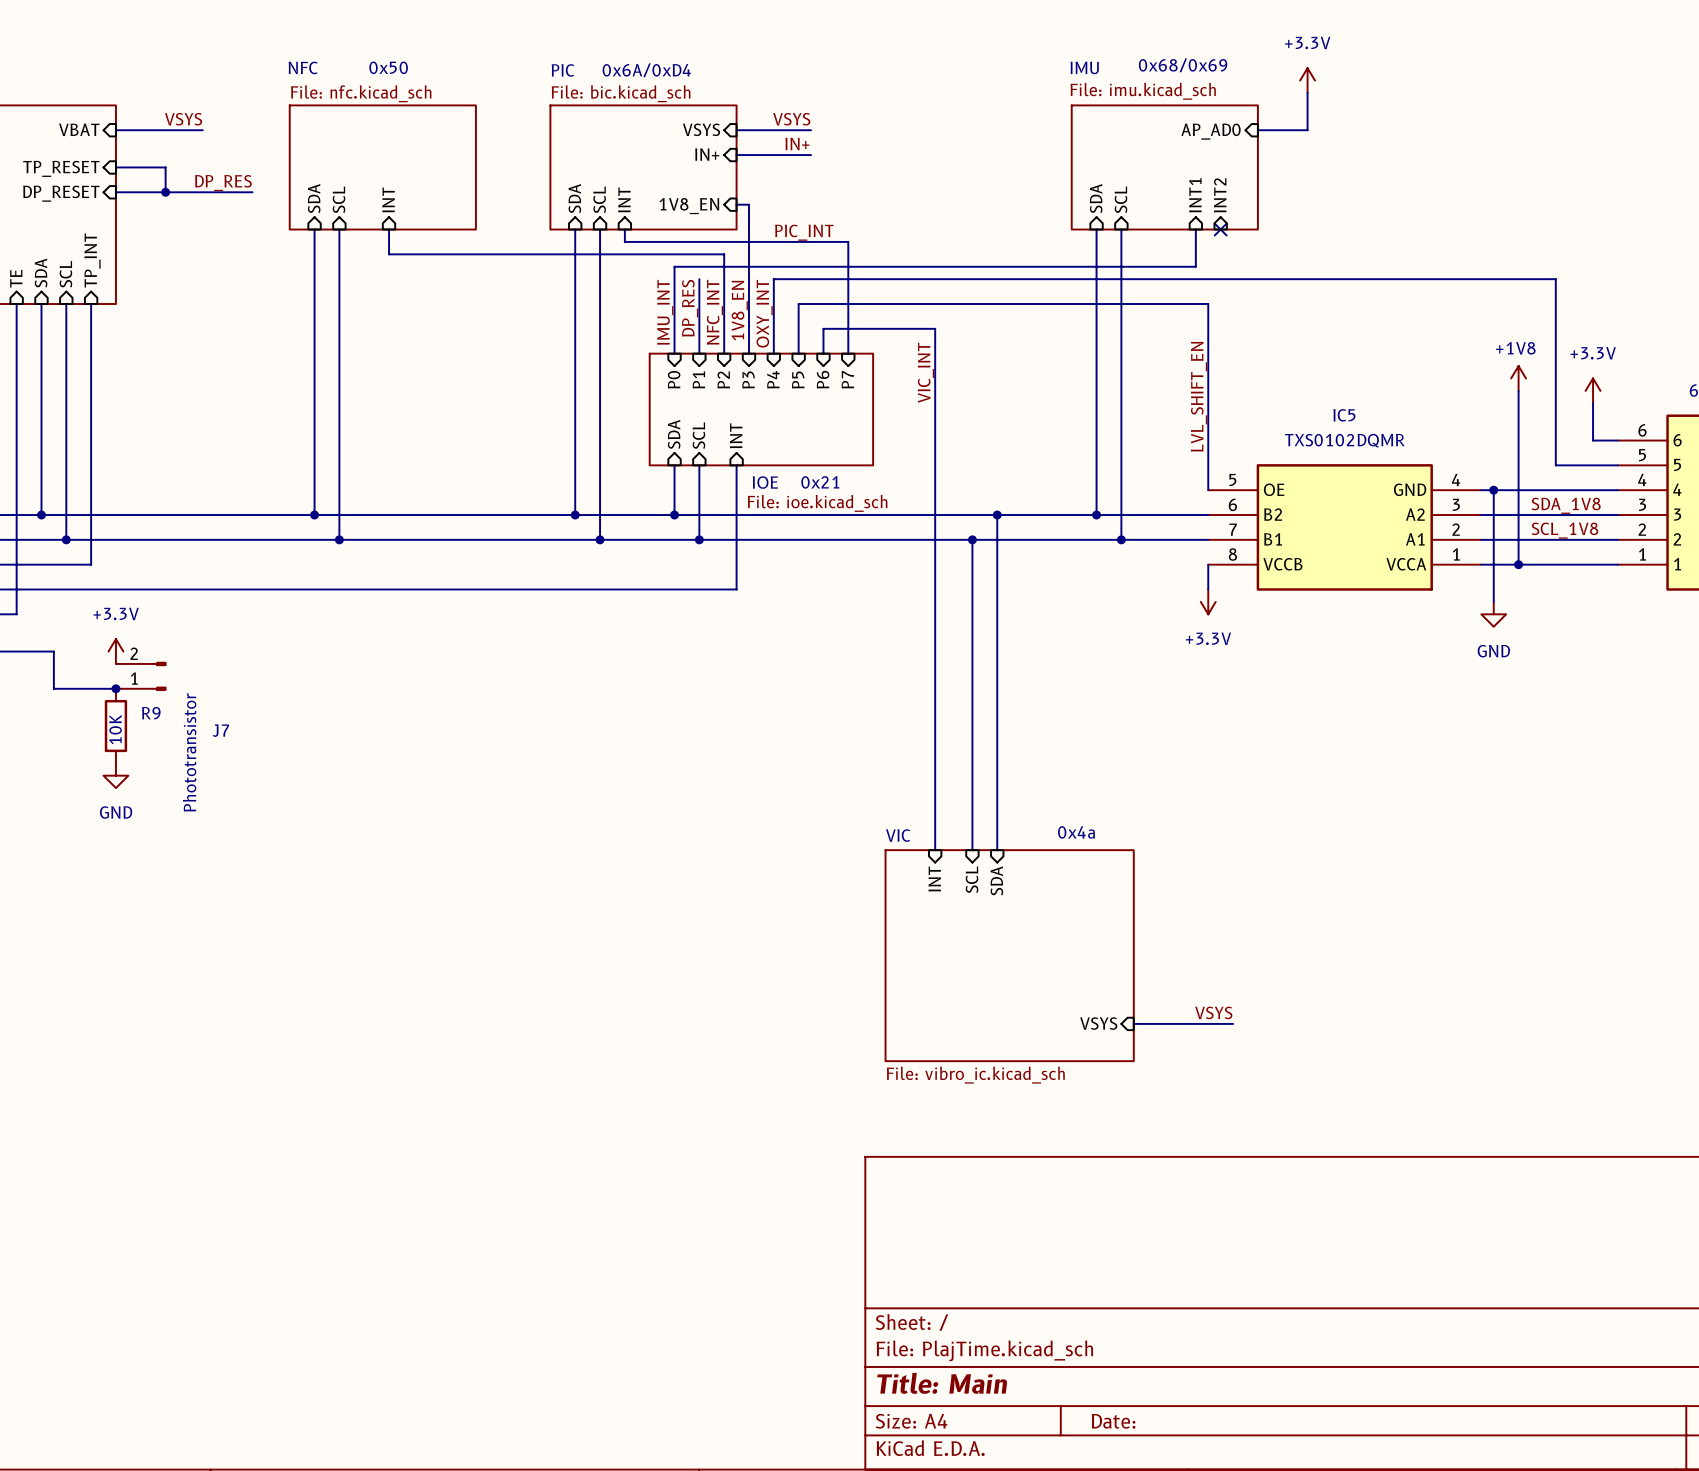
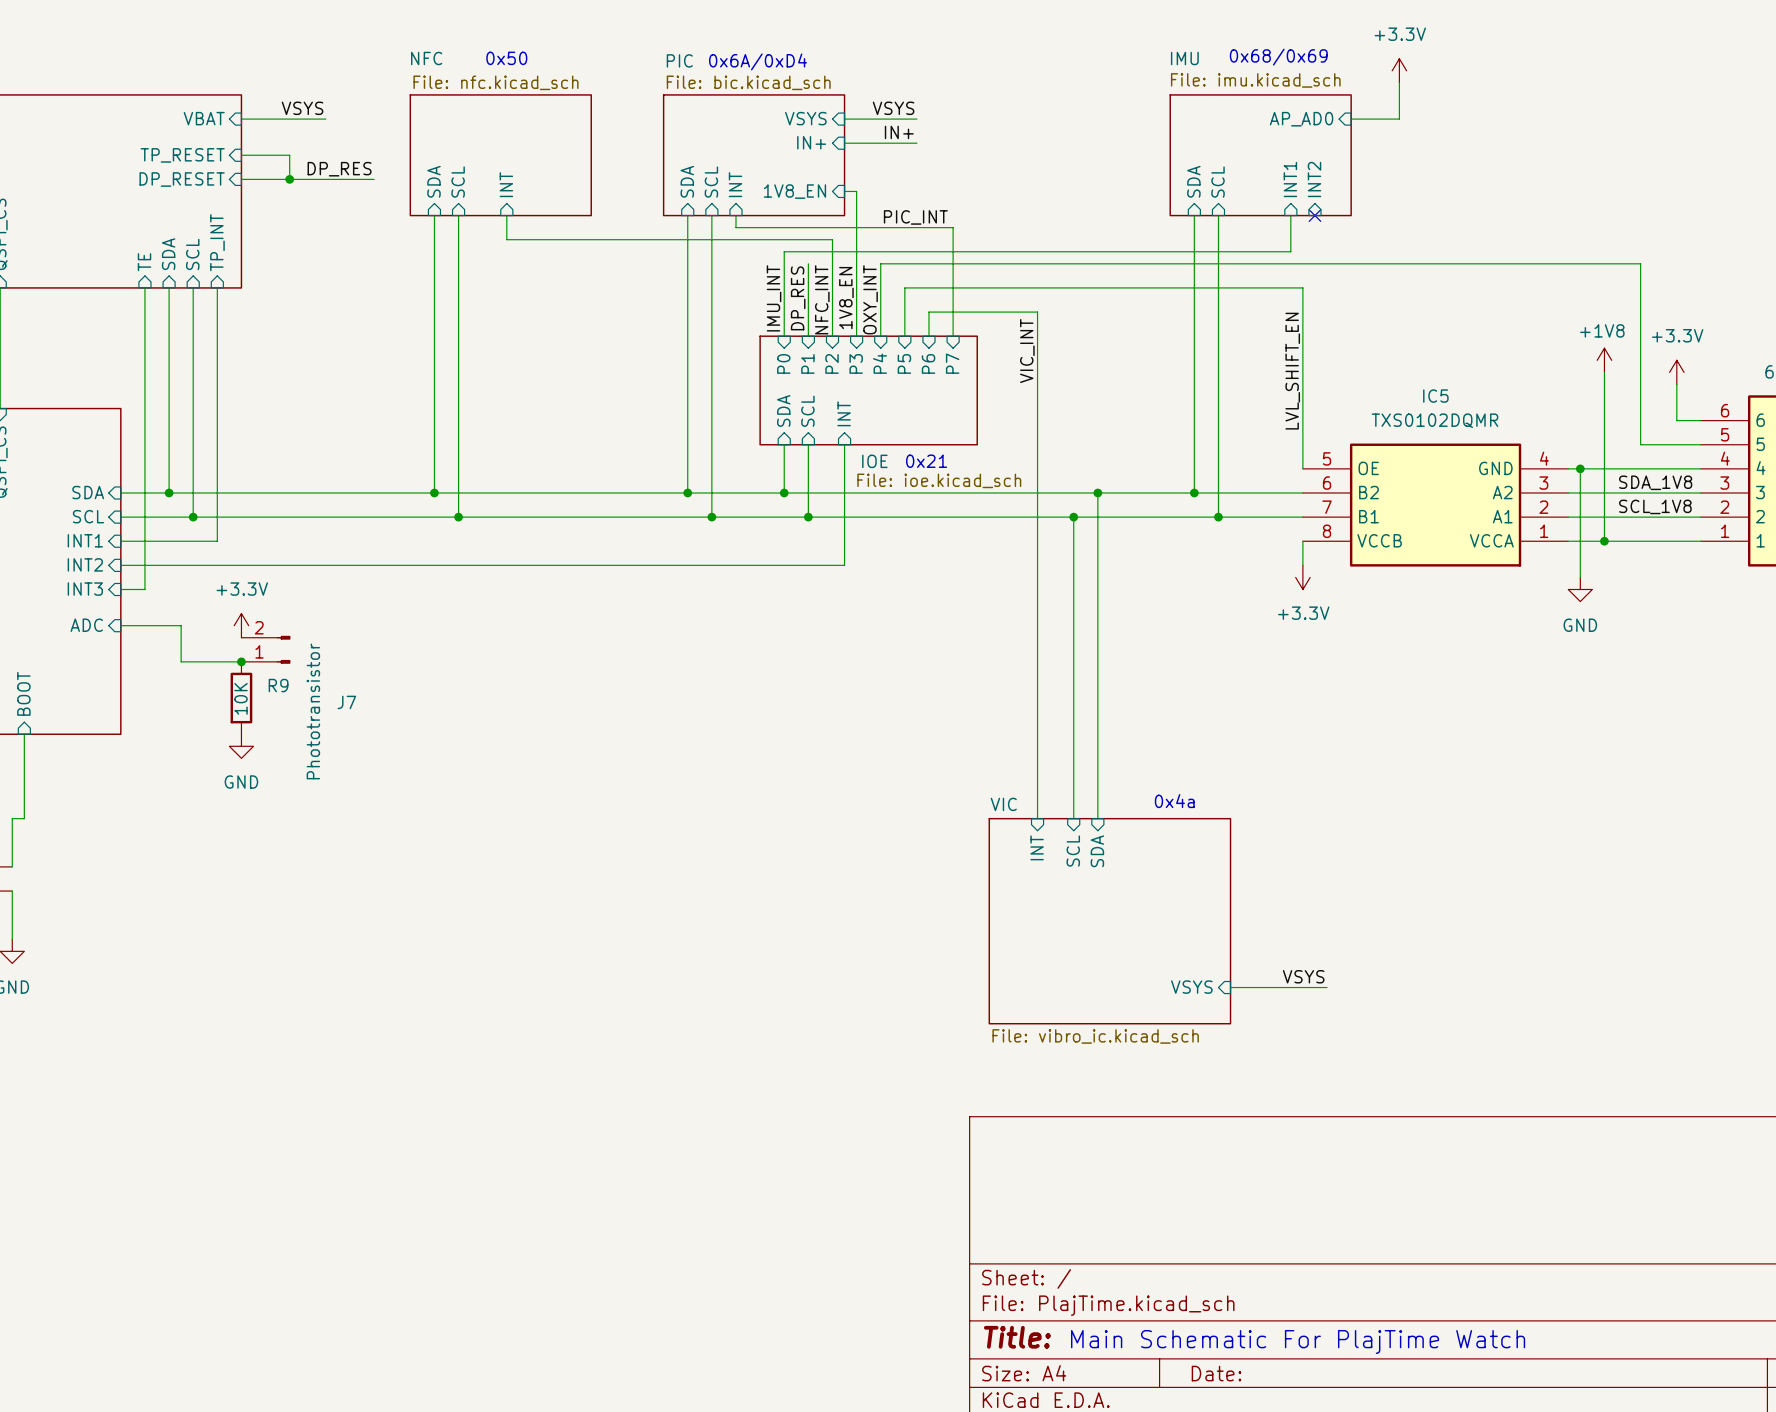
title block: Title: Main (942, 1383) -> Title: (1017, 1337)
text: none -> Main Schematic For PlajTime Watch (1298, 1341)

